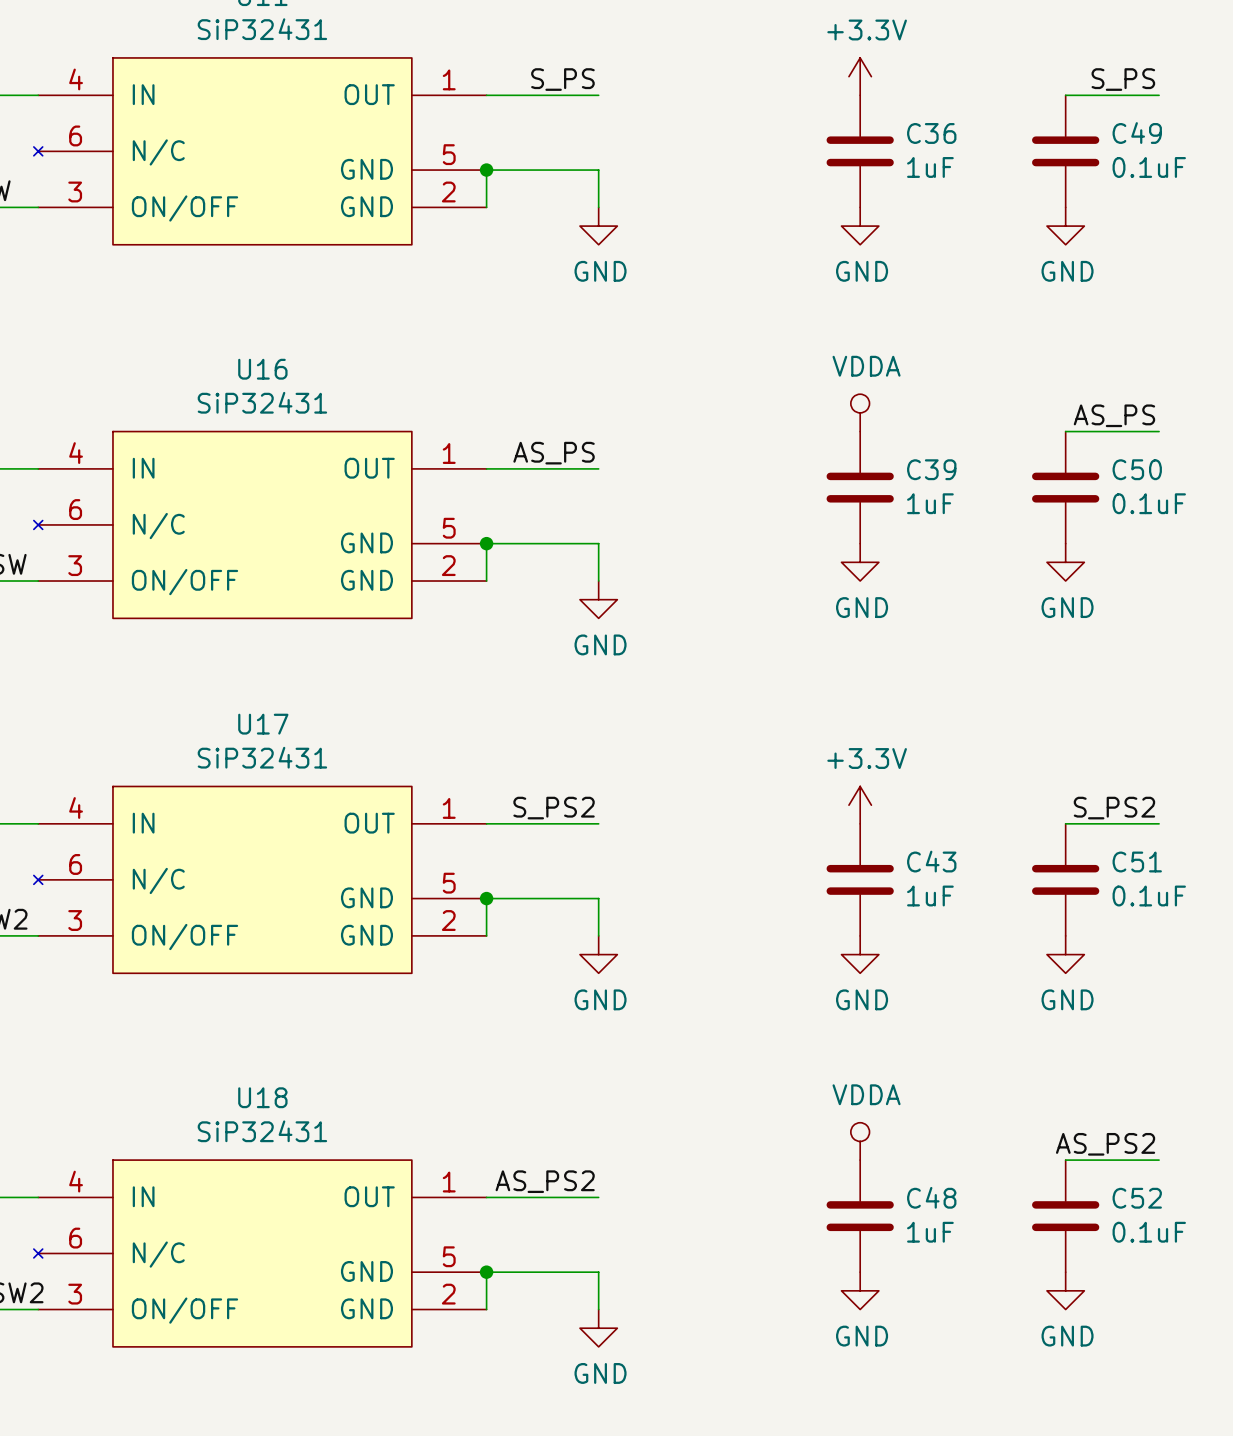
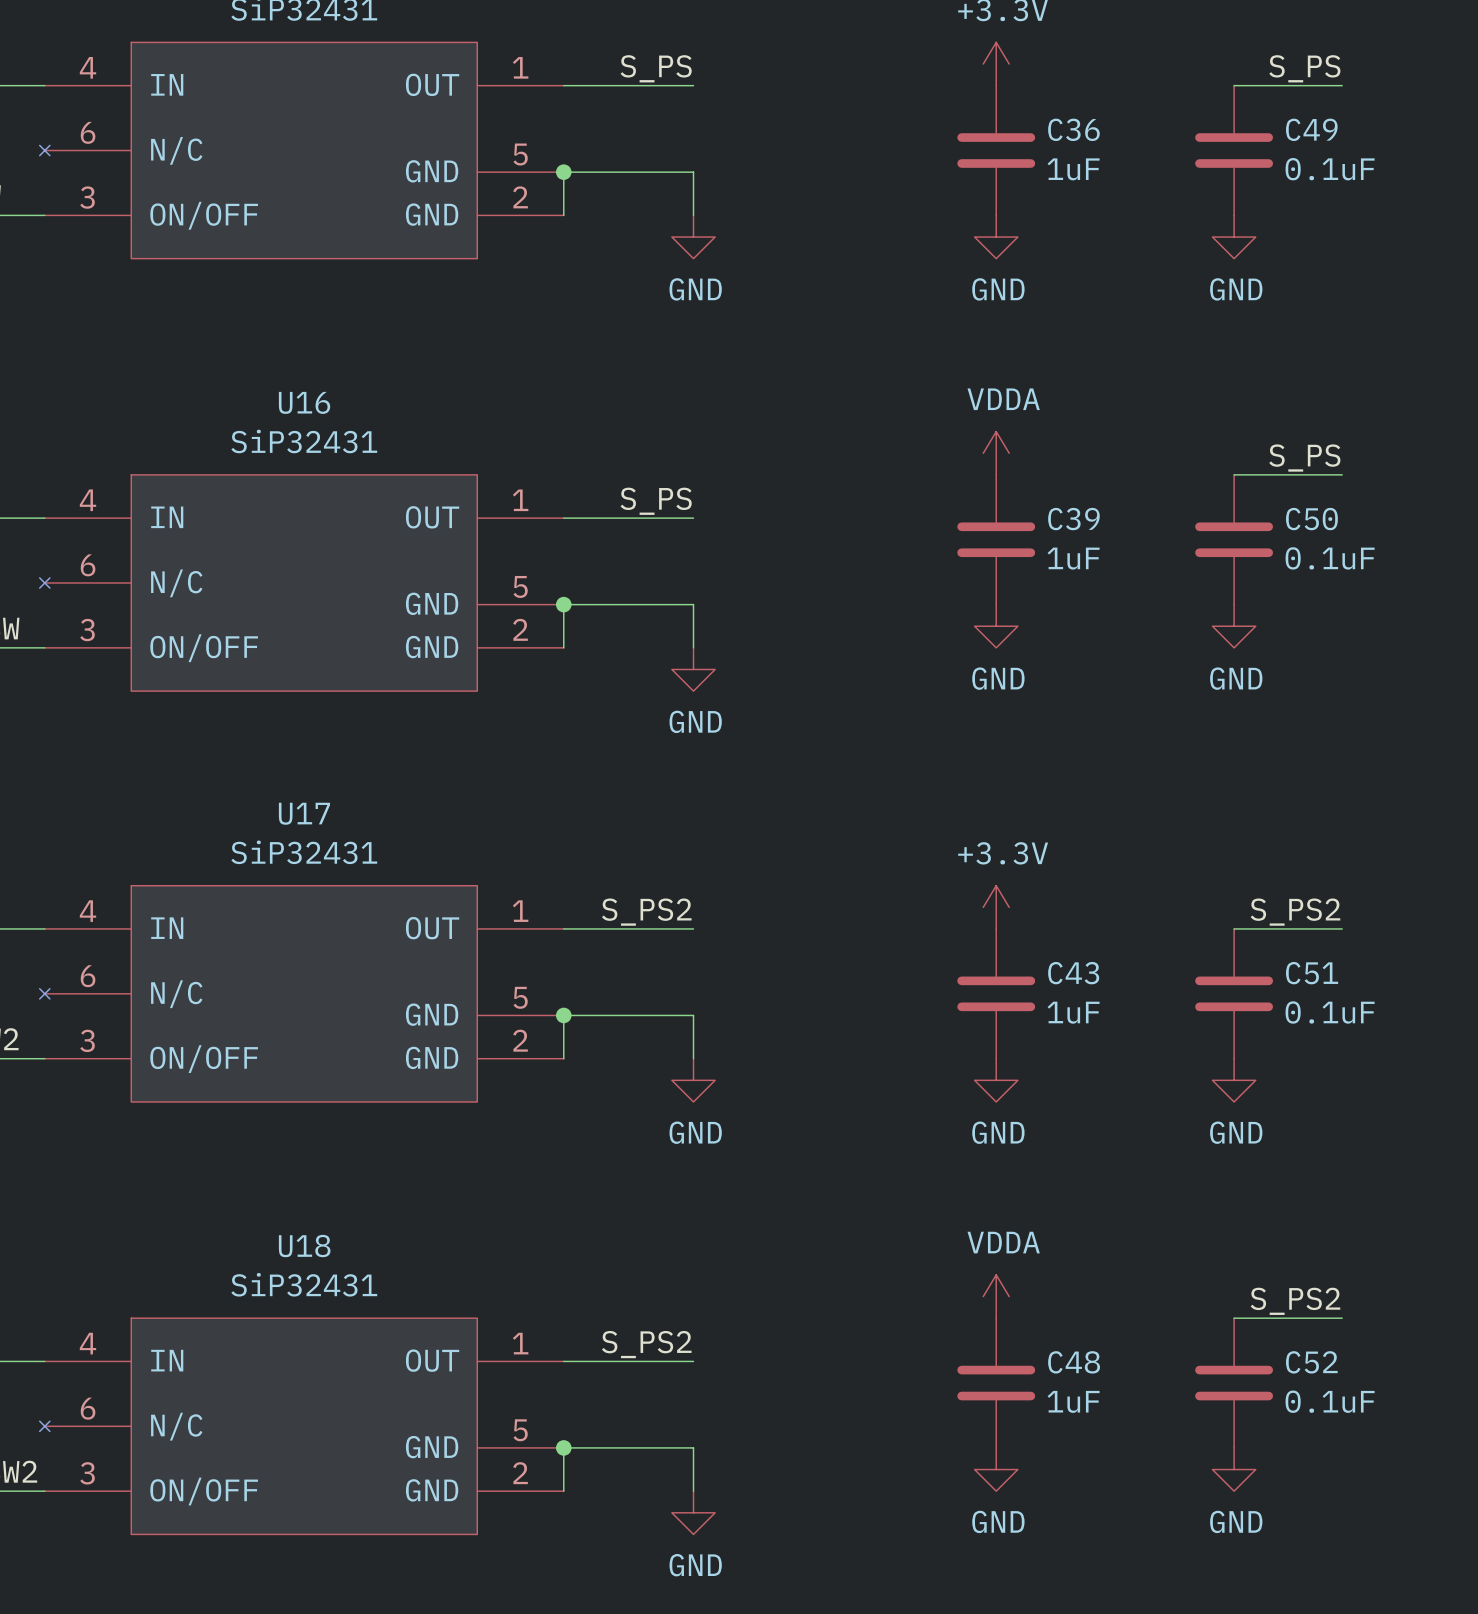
power symbol shape: [850, 394, 870, 432] -> [983, 431, 1010, 475]
label: AS_PS (1114, 415) -> S_PS (1304, 458)
label: AS_PS (554, 453) -> S_PS (656, 501)
power symbol shape: [850, 1122, 870, 1161] -> [983, 1274, 1010, 1319]
label: AS_PS2 (1105, 1144) -> S_PS2 (1295, 1301)
label: AS_PS2 (545, 1181) -> S_PS2 (646, 1344)

